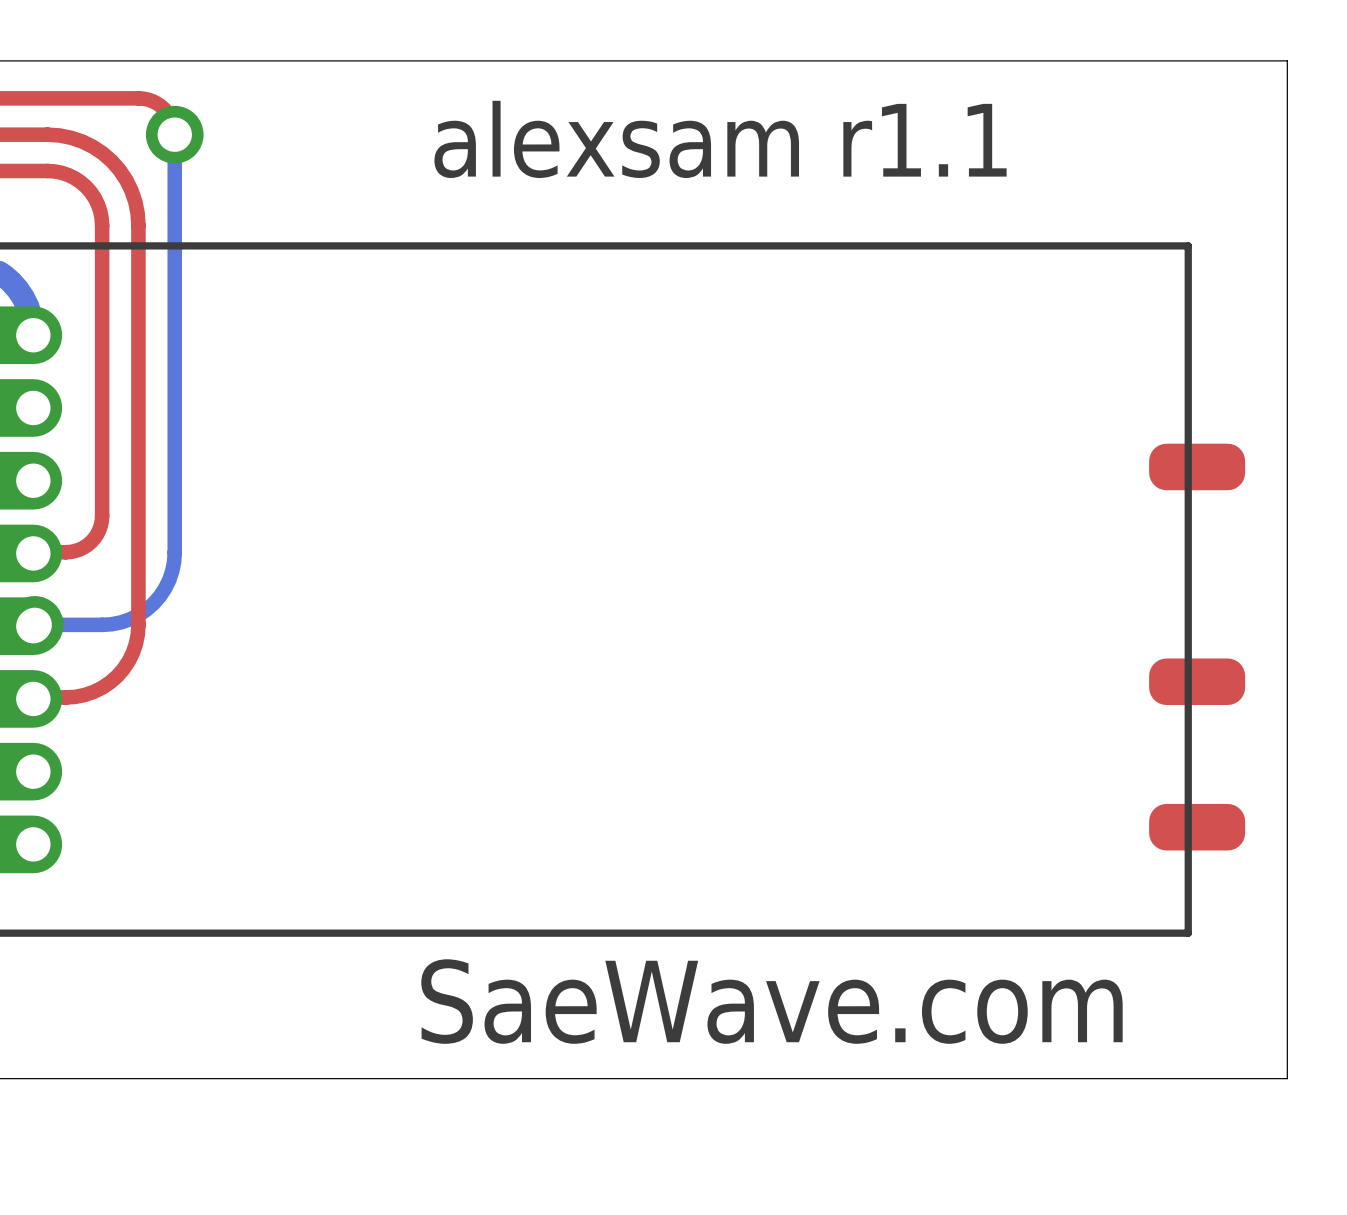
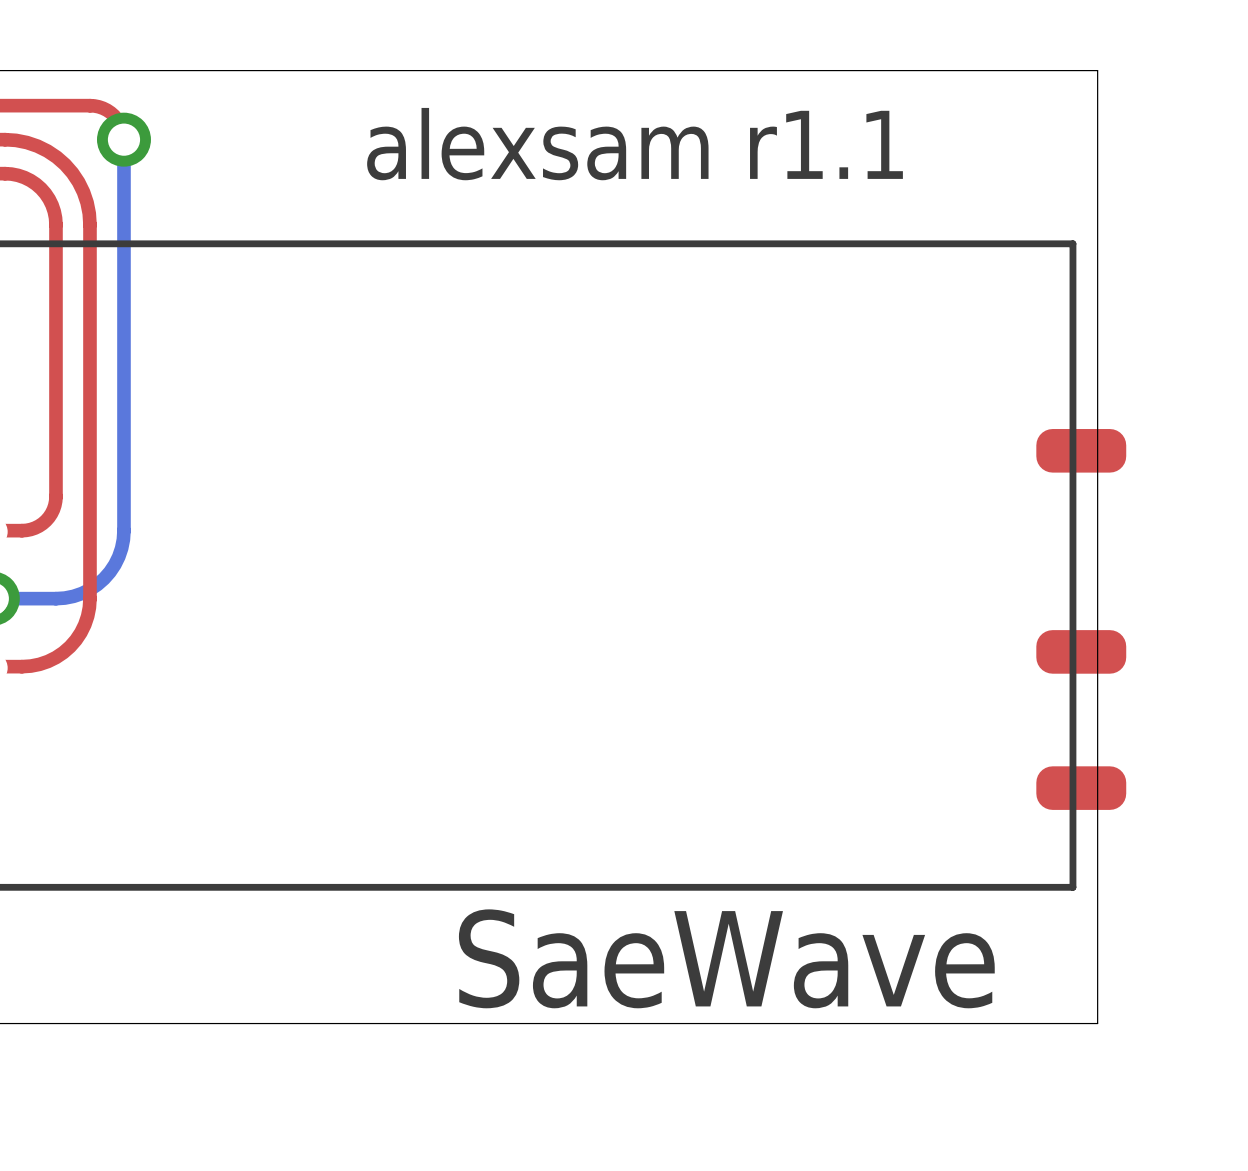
board edge: (1214, 60) (1287, 60) (1287, 1078) (1214, 1078) -> (1097, 70) (1097, 1023)
text: SaeWave.com (771, 1001) -> SaeWave (726, 958)

